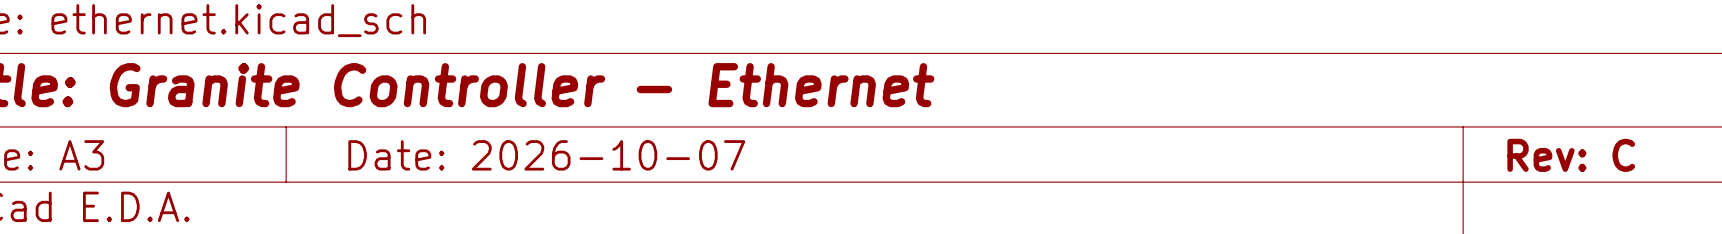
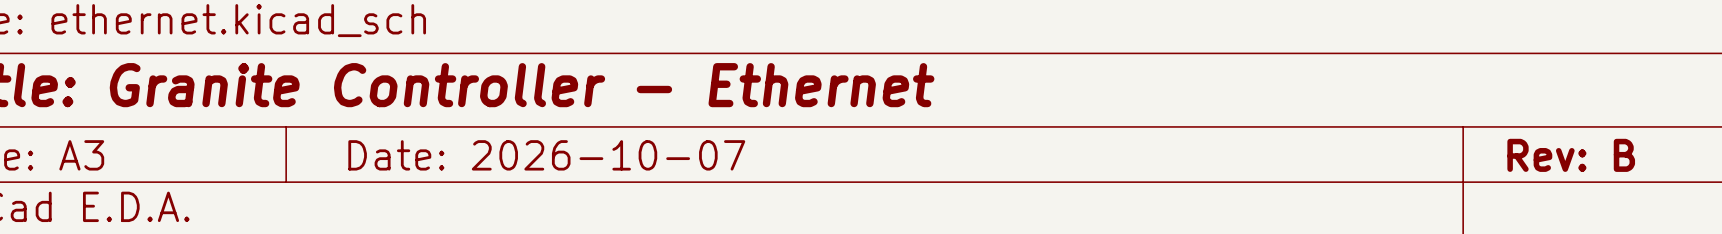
title block: Rev: C (1571, 155) -> Rev: B (1571, 155)

